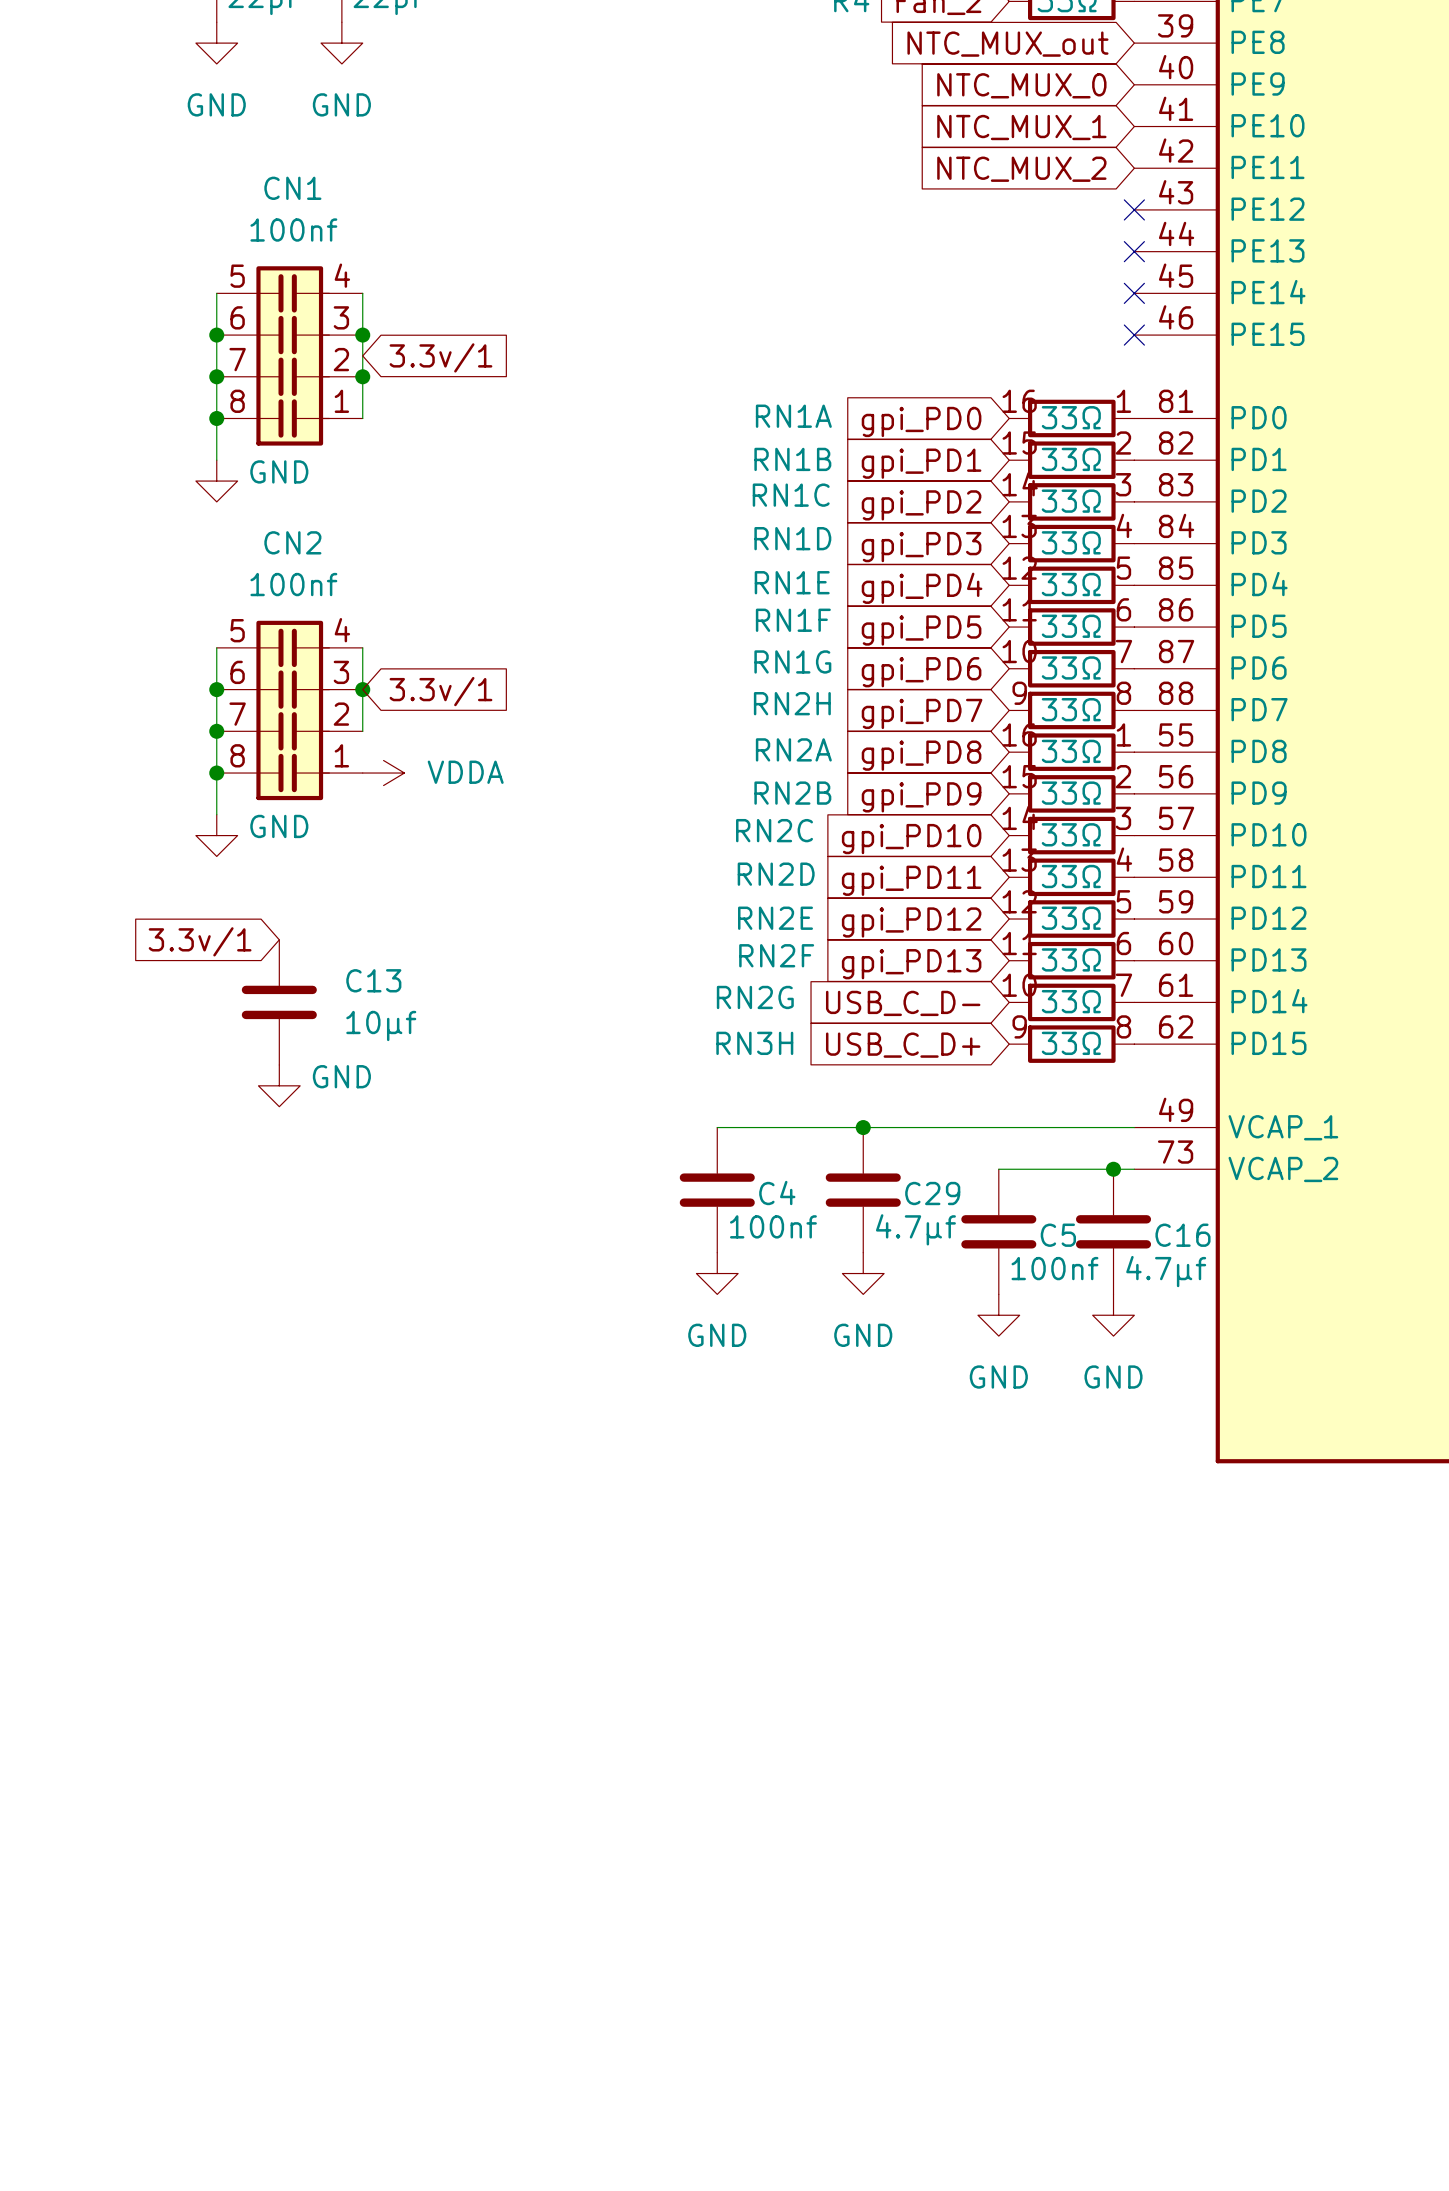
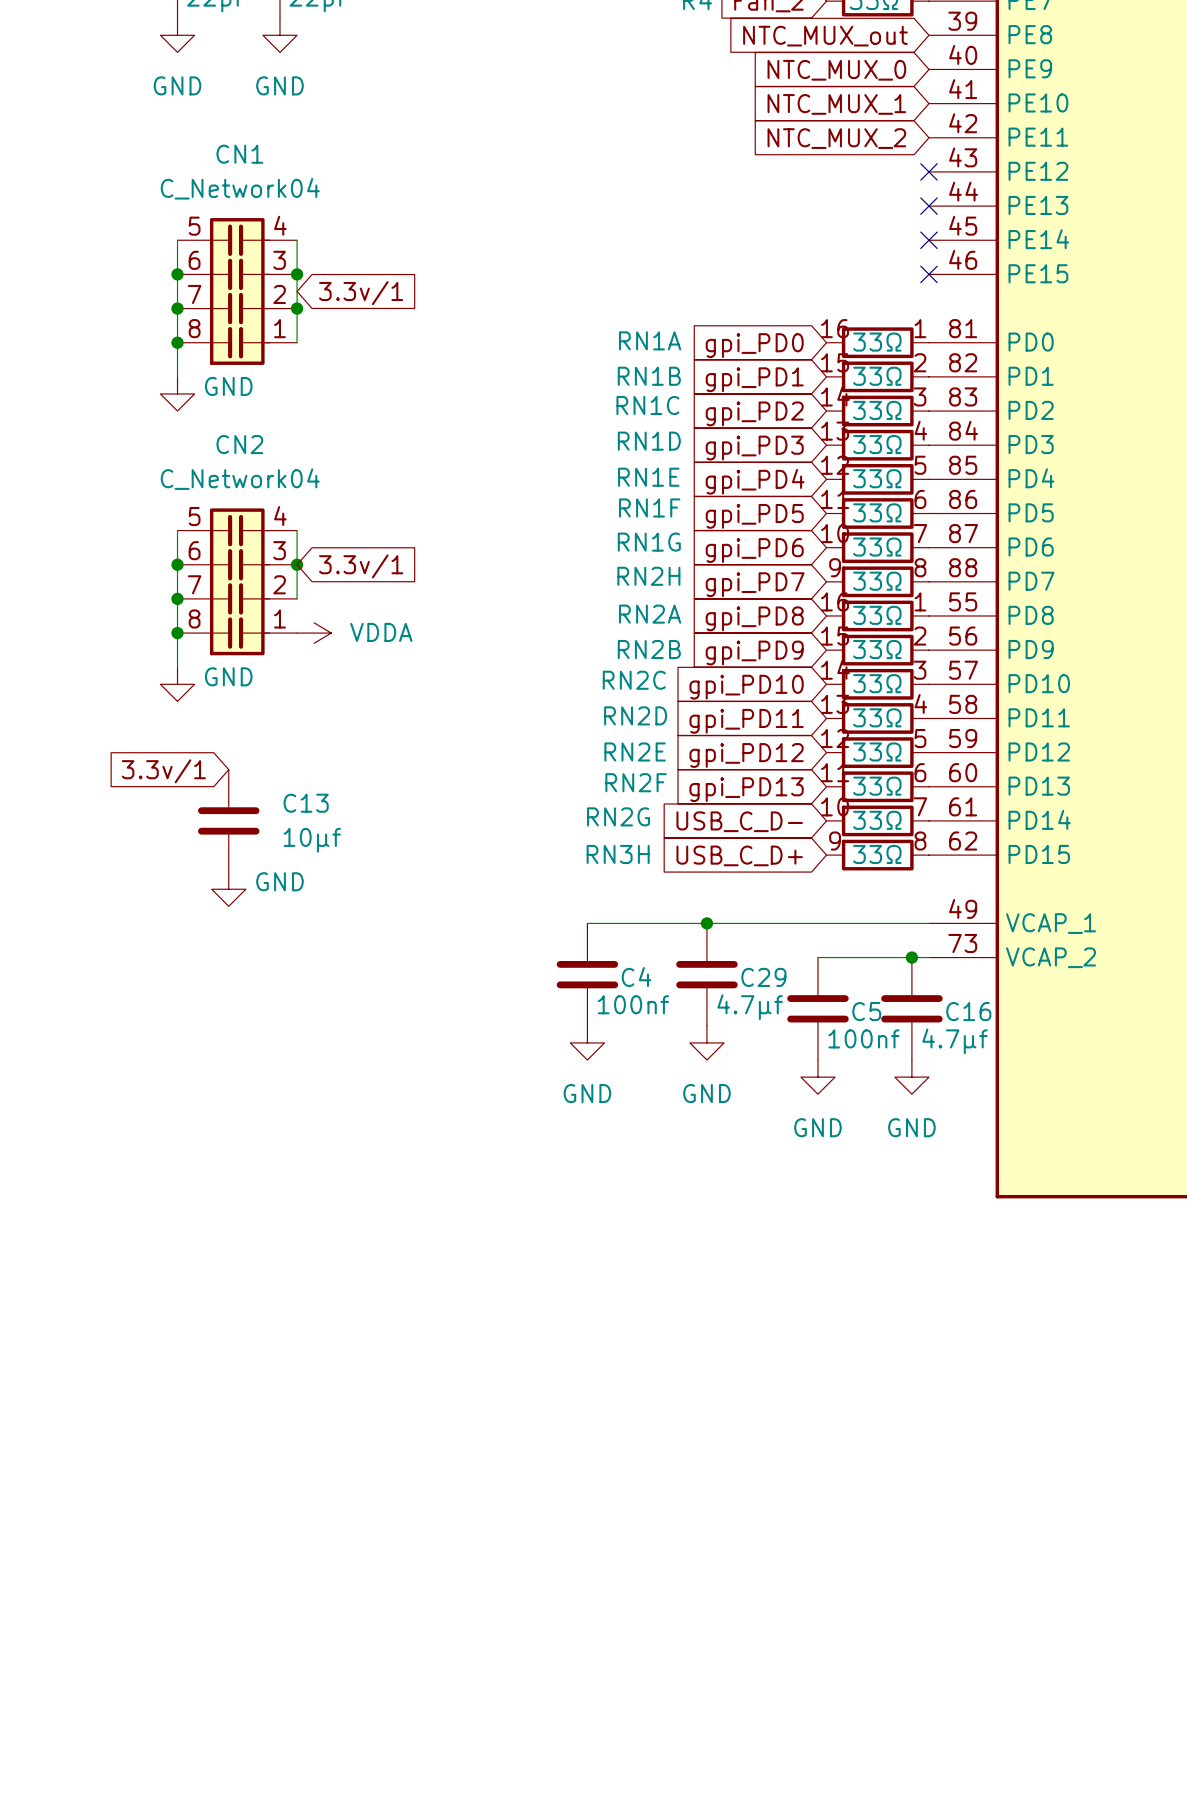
CN1 value: 100nf (293, 230) -> C_Network04 (240, 188)
CN2 value: 100nf (293, 584) -> C_Network04 (240, 479)

